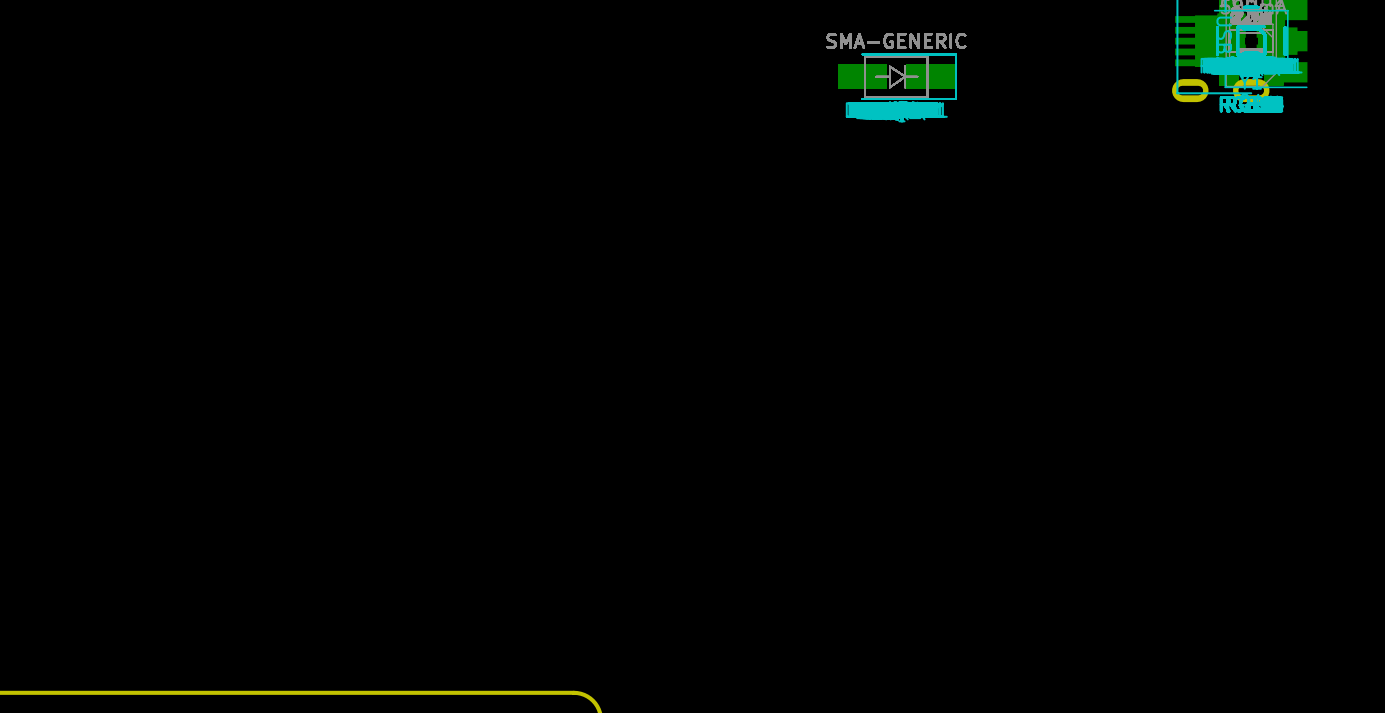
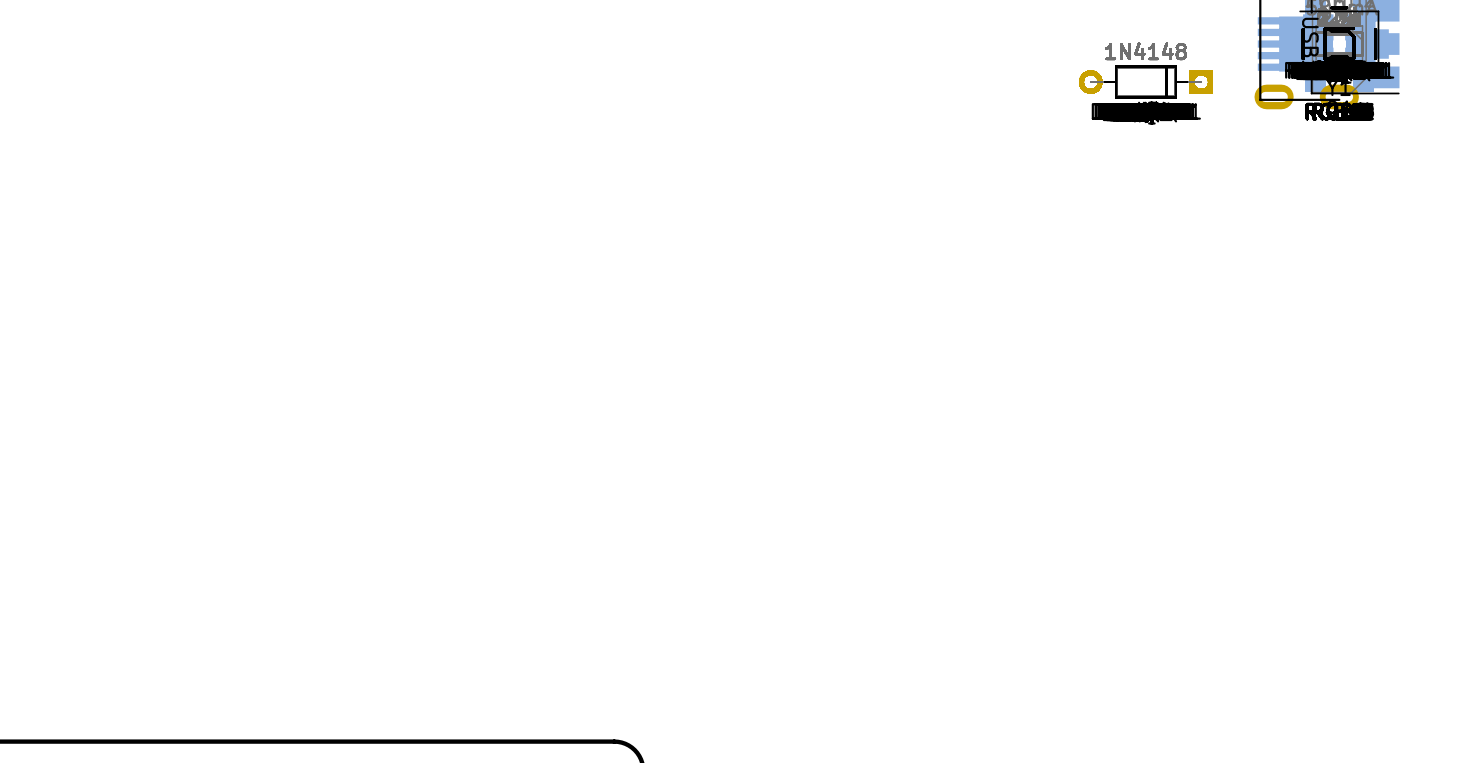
part value: SMA-GENERIC (896, 40) -> 1N4148 (1146, 51)
part value: SMA-GENERIC (896, 40) -> 1N4148 (1146, 51)
part value: SMA-GENERIC (896, 40) -> 1N4148 (1146, 51)
part value: SMA-GENERIC (896, 40) -> 1N4148 (1146, 51)
part value: SMA-GENERIC (896, 40) -> 1N4148 (1146, 51)
part value: SMA-GENERIC (896, 40) -> 1N4148 (1146, 51)
part value: SMA-GENERIC (896, 40) -> 1N4148 (1146, 51)
part value: SMA-GENERIC (896, 40) -> 1N4148 (1146, 51)
part value: SMA-GENERIC (896, 40) -> 1N4148 (1146, 51)
part value: SMA-GENERIC (896, 40) -> 1N4148 (1146, 51)
part value: SMA-GENERIC (896, 40) -> 1N4148 (1146, 51)
part value: SMA-GENERIC (896, 40) -> 1N4148 (1146, 51)
part value: SMA-GENERIC (896, 40) -> 1N4148 (1146, 51)
part value: SMA-GENERIC (896, 40) -> 1N4148 (1146, 51)
part value: SMA-GENERIC (896, 40) -> 1N4148 (1146, 51)
part value: SMA-GENERIC (896, 40) -> 1N4148 (1146, 51)
part value: SMA-GENERIC (896, 40) -> 1N4148 (1146, 51)
part value: SMA-GENERIC (896, 40) -> 1N4148 (1146, 51)
part value: SMA-GENERIC (896, 40) -> 1N4148 (1146, 51)
part value: SMA-GENERIC (896, 40) -> 1N4148 (1146, 51)
part value: SMA-GENERIC (896, 40) -> 1N4148 (1146, 51)
part value: SMA-GENERIC (896, 40) -> 1N4148 (1146, 51)
part value: SMA-GENERIC (896, 40) -> 1N4148 (1146, 51)
part value: SMA-GENERIC (896, 40) -> 1N4148 (1146, 51)
part value: SMA-GENERIC (896, 40) -> 1N4148 (1146, 51)
part value: SMA-GENERIC (896, 40) -> 1N4148 (1146, 51)
part value: SMA-GENERIC (896, 40) -> 1N4148 (1146, 51)
part value: SMA-GENERIC (896, 40) -> 1N4148 (1146, 51)
part value: SMA-GENERIC (896, 40) -> 1N4148 (1146, 51)
part value: SMA-GENERIC (896, 40) -> 1N4148 (1146, 51)
part value: SMA-GENERIC (896, 40) -> 1N4148 (1146, 51)
part value: SMA-GENERIC (896, 40) -> 1N4148 (1146, 51)
part value: SMA-GENERIC (896, 40) -> 1N4148 (1146, 51)
part value: SMA-GENERIC (896, 40) -> 1N4148 (1146, 51)
part value: SMA-GENERIC (896, 40) -> 1N4148 (1146, 51)
part value: SMA-GENERIC (896, 40) -> 1N4148 (1146, 51)
part value: SMA-GENERIC (896, 40) -> 1N4148 (1146, 51)
part value: SMA-GENERIC (896, 40) -> 1N4148 (1146, 51)
part value: SMA-GENERIC (896, 40) -> 1N4148 (1146, 51)
part value: SMA-GENERIC (896, 40) -> 1N4148 (1146, 51)
part value: SMA-GENERIC (896, 40) -> 1N4148 (1146, 51)
part value: SMA-GENERIC (896, 40) -> 1N4148 (1146, 51)
part value: SMA-GENERIC (896, 40) -> 1N4148 (1146, 51)
part value: SMA-GENERIC (896, 40) -> 1N4148 (1146, 51)
part value: SMA-GENERIC (896, 40) -> 1N4148 (1146, 51)
part value: SMA-GENERIC (896, 40) -> 1N4148 (1146, 51)
part value: SMA-GENERIC (896, 40) -> 1N4148 (1146, 51)
part value: SMA-GENERIC (896, 40) -> 1N4148 (1146, 51)
part value: SMA-GENERIC (896, 40) -> 1N4148 (1146, 51)
part value: SMA-GENERIC (896, 40) -> 1N4148 (1146, 51)
part value: SMA-GENERIC (896, 40) -> 1N4148 (1146, 51)
part value: SMA-GENERIC (896, 40) -> 1N4148 (1146, 51)
part value: SMA-GENERIC (896, 40) -> 1N4148 (1146, 51)
part value: SMA-GENERIC (896, 40) -> 1N4148 (1146, 51)
part value: SMA-GENERIC (896, 40) -> 1N4148 (1146, 51)
part value: SMA-GENERIC (896, 40) -> 1N4148 (1146, 51)
part value: SMA-GENERIC (896, 40) -> 1N4148 (1146, 51)
part value: SMA-GENERIC (896, 40) -> 1N4148 (1146, 51)
part value: SMA-GENERIC (896, 40) -> 1N4148 (1146, 51)
part value: SMA-GENERIC (896, 40) -> 1N4148 (1146, 51)
part value: SMA-GENERIC (896, 40) -> 1N4148 (1146, 51)
part value: SMA-GENERIC (896, 40) -> 1N4148 (1146, 51)
part value: SMA-GENERIC (896, 40) -> 1N4148 (1146, 51)
part value: SMA-GENERIC (896, 40) -> 1N4148 (1146, 51)
part value: SMA-GENERIC (896, 40) -> 1N4148 (1146, 51)
part value: SMA-GENERIC (896, 40) -> 1N4148 (1146, 51)
part footprint: [838, 53, 957, 100] -> [1079, 65, 1213, 99]
part footprint: [838, 53, 957, 100] -> [1079, 65, 1213, 99]
part footprint: [838, 53, 957, 100] -> [1079, 65, 1213, 99]
part footprint: [838, 53, 957, 100] -> [1079, 65, 1213, 99]
part footprint: [838, 53, 957, 100] -> [1079, 65, 1213, 99]
part footprint: [838, 53, 957, 100] -> [1079, 65, 1213, 99]
part footprint: [838, 53, 957, 100] -> [1079, 65, 1213, 99]
part footprint: [838, 53, 957, 100] -> [1079, 65, 1213, 99]
part footprint: [838, 53, 957, 100] -> [1079, 65, 1213, 99]
part footprint: [838, 53, 957, 100] -> [1079, 65, 1213, 99]
part footprint: [838, 53, 957, 100] -> [1079, 65, 1213, 99]
part footprint: [838, 53, 957, 100] -> [1079, 65, 1213, 99]
part footprint: [838, 53, 957, 100] -> [1079, 65, 1213, 99]
part footprint: [838, 53, 957, 100] -> [1079, 65, 1213, 99]
part footprint: [838, 53, 957, 100] -> [1079, 65, 1213, 99]
part footprint: [838, 53, 957, 100] -> [1079, 65, 1213, 99]
part footprint: [838, 53, 957, 100] -> [1079, 65, 1213, 99]
part footprint: [838, 53, 957, 100] -> [1079, 65, 1213, 99]
part footprint: [838, 53, 957, 100] -> [1079, 65, 1213, 99]
part footprint: [838, 53, 957, 100] -> [1079, 65, 1213, 99]
part footprint: [838, 53, 957, 100] -> [1079, 65, 1213, 99]
part footprint: [838, 53, 957, 100] -> [1079, 65, 1213, 99]
part footprint: [838, 53, 957, 100] -> [1079, 65, 1213, 99]
part footprint: [838, 53, 957, 100] -> [1079, 65, 1213, 99]
part footprint: [838, 53, 957, 100] -> [1079, 65, 1213, 99]
part footprint: [838, 53, 957, 100] -> [1079, 65, 1213, 99]
part footprint: [838, 53, 957, 100] -> [1079, 65, 1213, 99]
part footprint: [838, 53, 957, 100] -> [1079, 65, 1213, 99]
part footprint: [838, 53, 957, 100] -> [1079, 65, 1213, 99]
part footprint: [838, 53, 957, 100] -> [1079, 65, 1213, 99]
part footprint: [838, 53, 957, 100] -> [1079, 65, 1213, 99]
part footprint: [838, 53, 957, 100] -> [1079, 65, 1213, 99]
part footprint: [838, 53, 957, 100] -> [1079, 65, 1213, 99]
part footprint: [838, 53, 957, 100] -> [1079, 65, 1213, 99]
part footprint: [838, 53, 957, 100] -> [1079, 65, 1213, 99]
part footprint: [838, 53, 957, 100] -> [1079, 65, 1213, 99]
part footprint: [838, 53, 957, 100] -> [1079, 65, 1213, 99]
part footprint: [838, 53, 957, 100] -> [1079, 65, 1213, 99]
part footprint: [838, 53, 957, 100] -> [1079, 65, 1213, 99]
part footprint: [838, 53, 957, 100] -> [1079, 65, 1213, 99]
part footprint: [838, 53, 957, 100] -> [1079, 65, 1213, 99]
part footprint: [838, 53, 957, 100] -> [1079, 65, 1213, 99]
part footprint: [838, 53, 957, 100] -> [1079, 65, 1213, 99]
part footprint: [838, 53, 957, 100] -> [1079, 65, 1213, 99]
part footprint: [838, 53, 957, 100] -> [1079, 65, 1213, 99]
part footprint: [838, 53, 957, 100] -> [1079, 65, 1213, 99]
part footprint: [838, 53, 957, 100] -> [1079, 65, 1213, 99]
part footprint: [838, 53, 957, 100] -> [1079, 65, 1213, 99]
part footprint: [838, 53, 957, 100] -> [1079, 65, 1213, 99]
part footprint: [838, 53, 957, 100] -> [1079, 65, 1213, 99]
part footprint: [838, 53, 957, 100] -> [1079, 65, 1213, 99]
part footprint: [838, 53, 957, 100] -> [1079, 65, 1213, 99]
part footprint: [838, 53, 957, 100] -> [1079, 65, 1213, 99]
part footprint: [838, 53, 957, 100] -> [1079, 65, 1213, 99]
part footprint: [838, 53, 957, 100] -> [1079, 65, 1213, 99]
part footprint: [838, 53, 957, 100] -> [1079, 65, 1213, 99]
part footprint: [838, 53, 957, 100] -> [1079, 65, 1213, 99]
part footprint: [838, 53, 957, 100] -> [1079, 65, 1213, 99]
part footprint: [838, 53, 957, 100] -> [1079, 65, 1213, 99]
part footprint: [838, 53, 957, 100] -> [1079, 65, 1213, 99]
part footprint: [838, 53, 957, 100] -> [1079, 65, 1213, 99]
part footprint: [838, 53, 957, 100] -> [1079, 65, 1213, 99]
part footprint: [838, 53, 957, 100] -> [1079, 65, 1213, 99]
part footprint: [838, 53, 957, 100] -> [1079, 65, 1213, 99]
part footprint: [838, 53, 957, 100] -> [1079, 65, 1213, 99]
part footprint: [838, 53, 957, 100] -> [1079, 65, 1213, 99]

